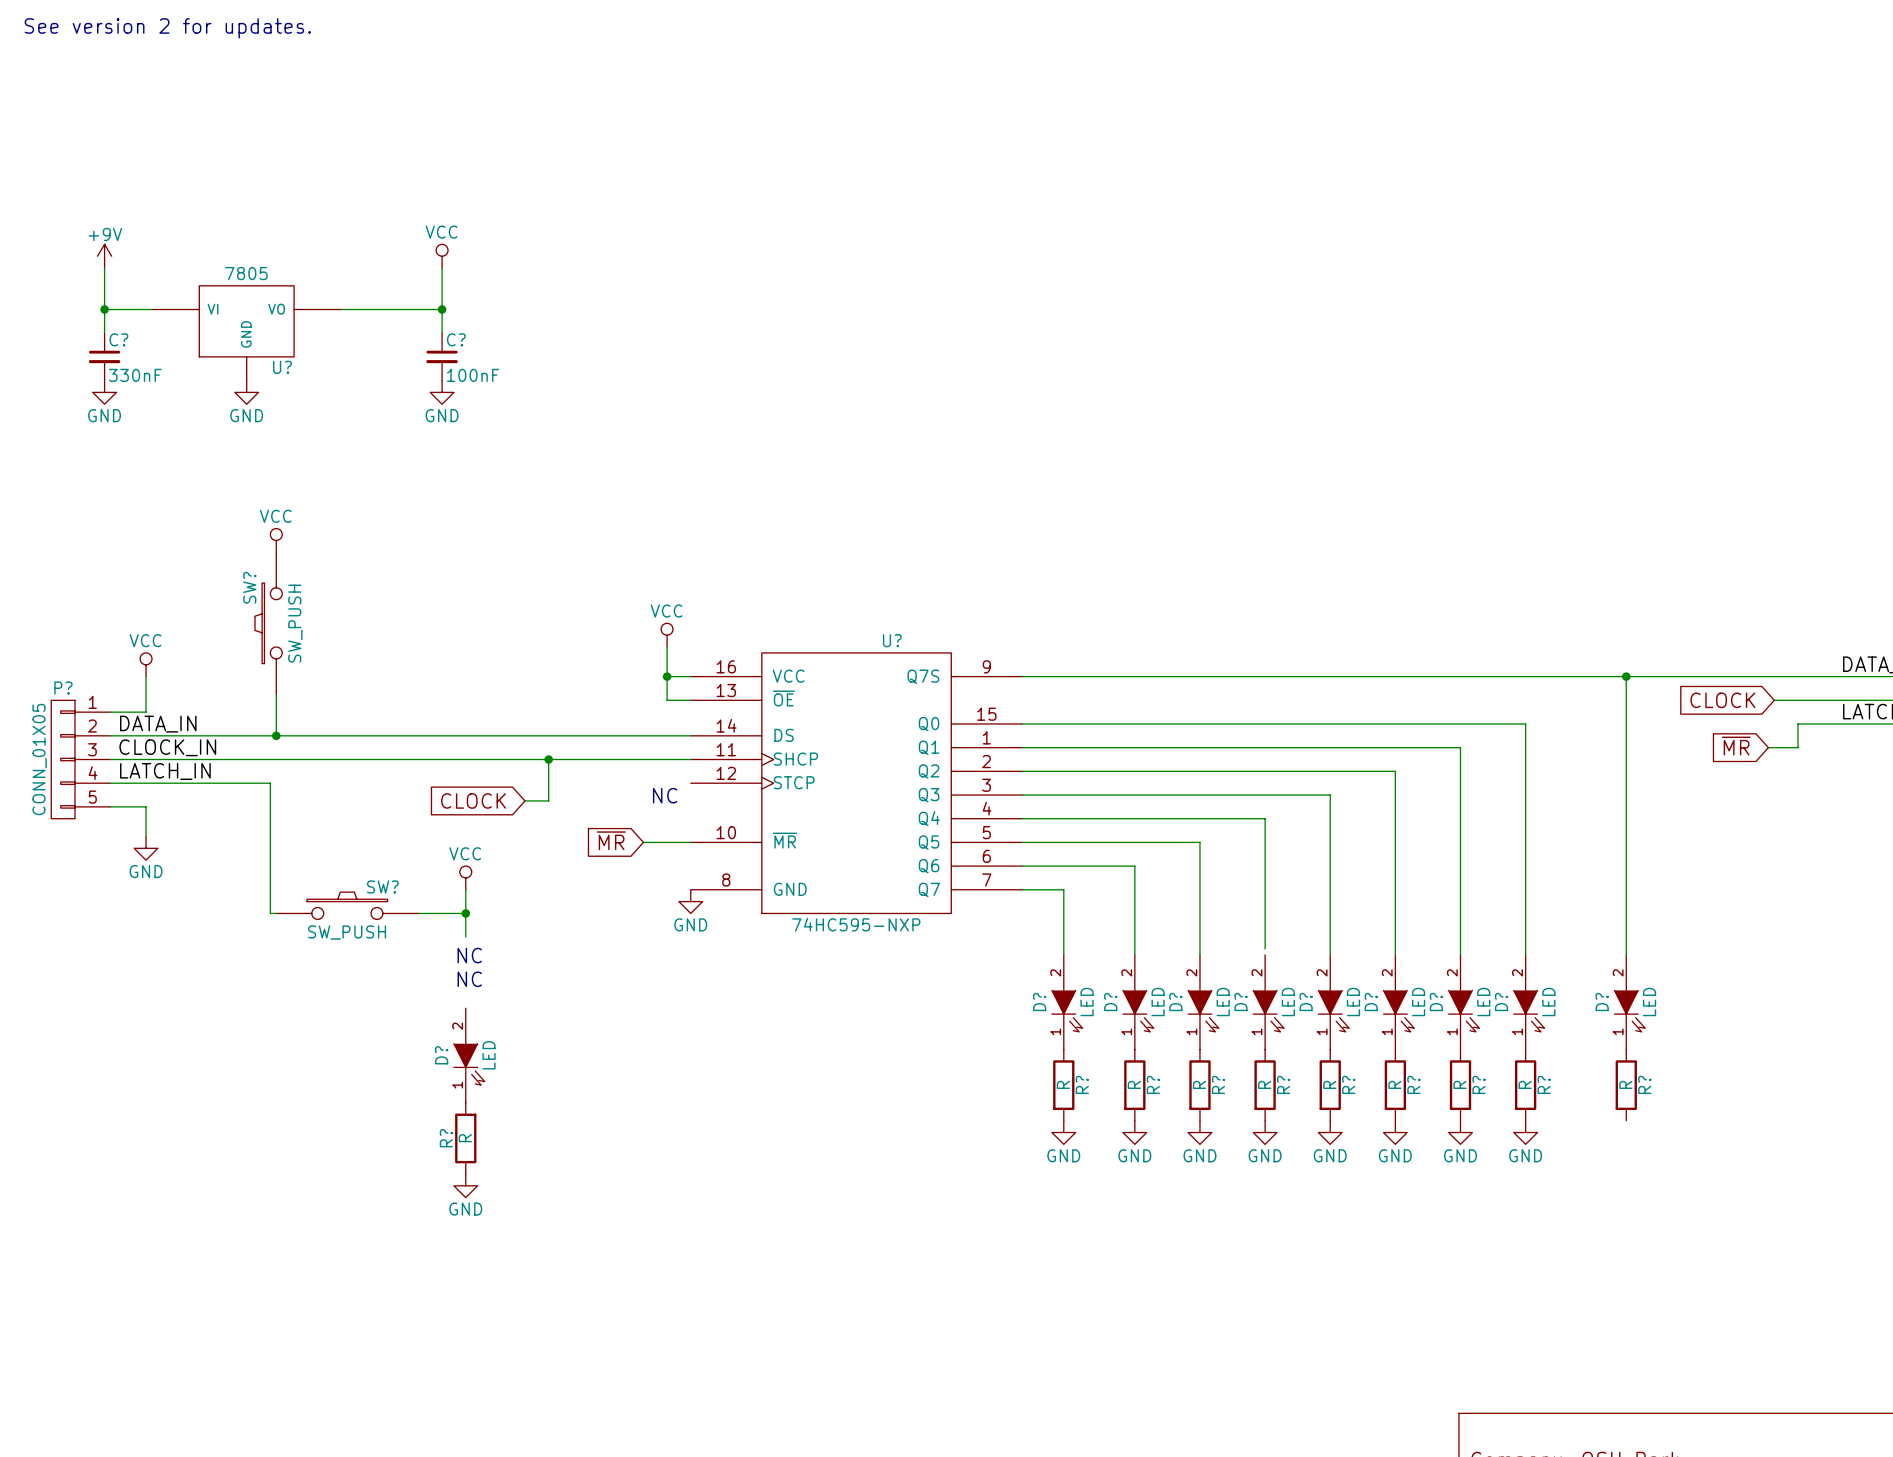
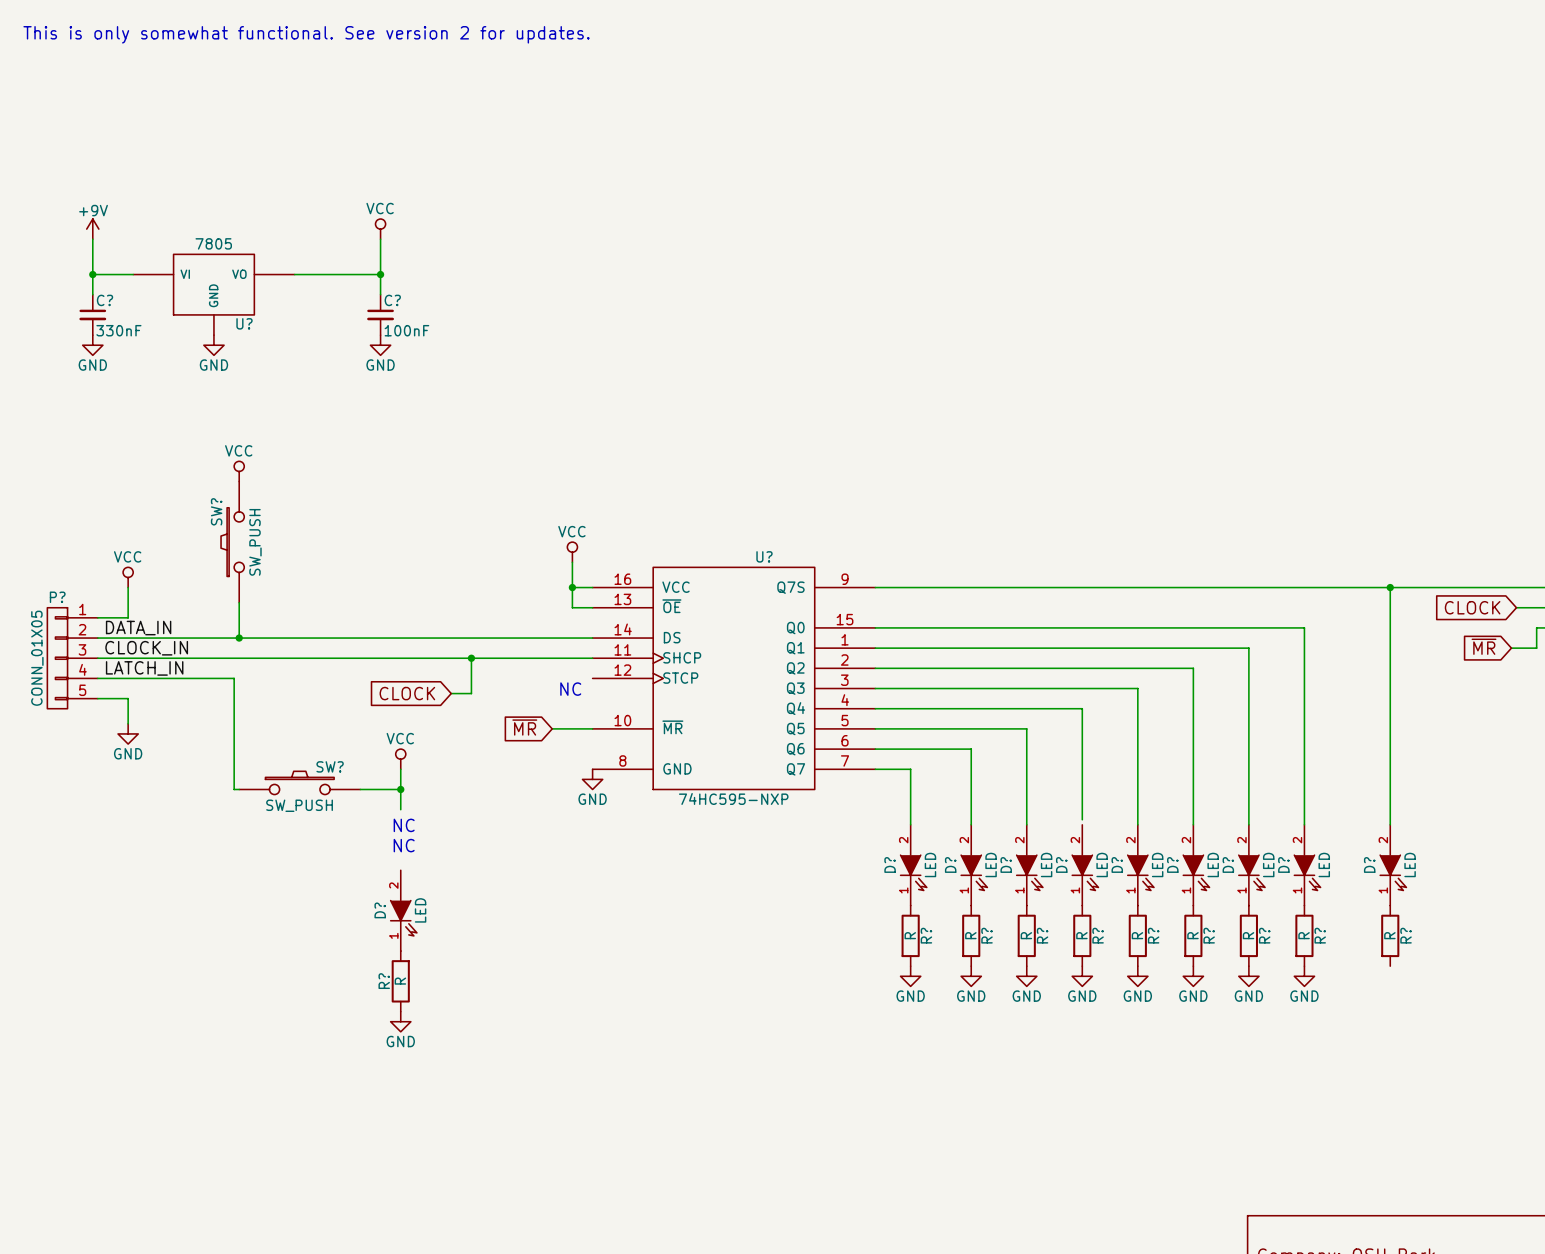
text: See version 2 for updates. (167, 28) -> This is only somewhat functional. See version 2 for updates. (306, 34)

